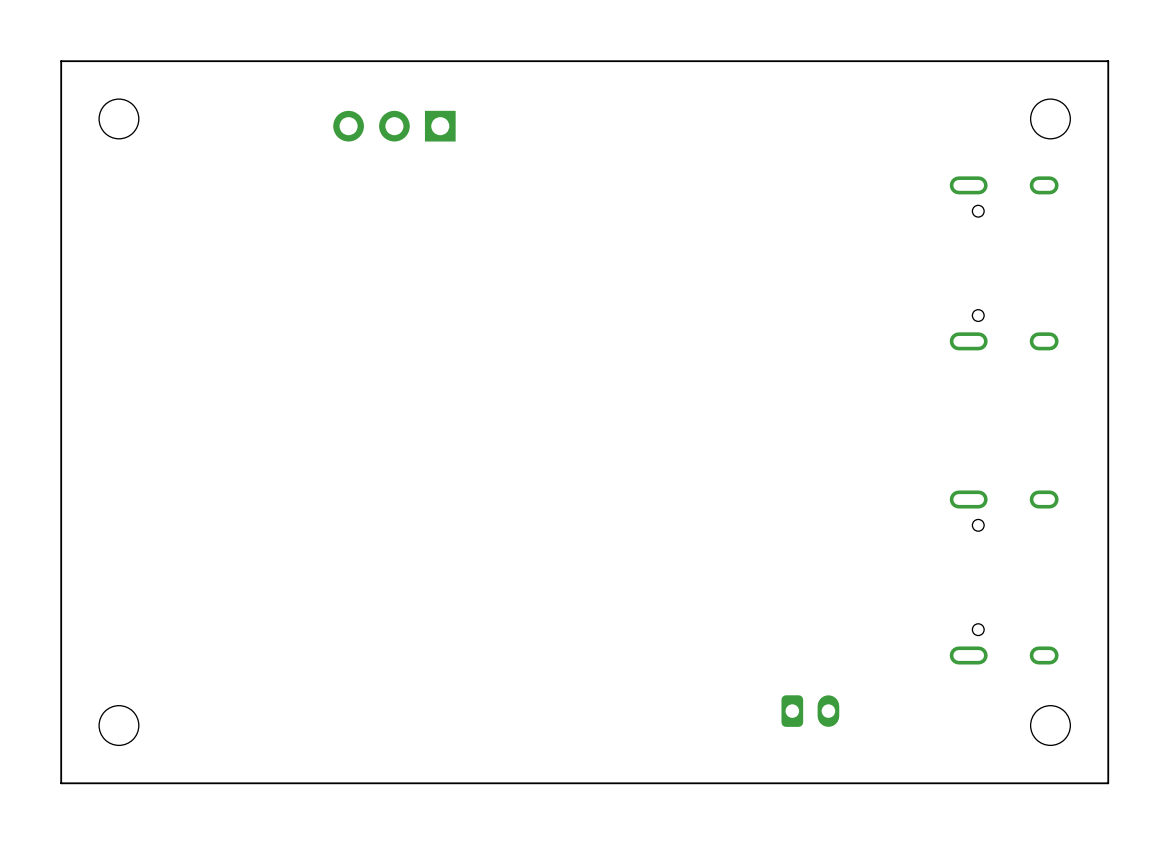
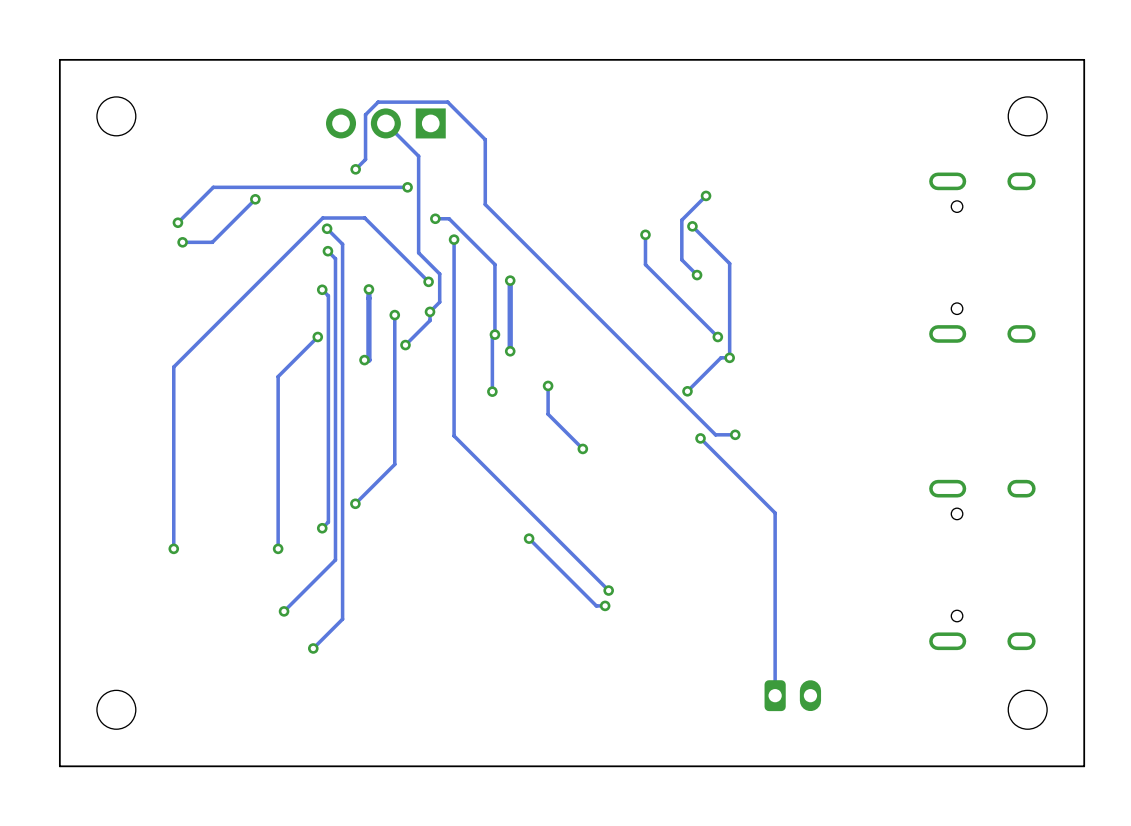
track: none -> (385, 123) (418, 156) (418, 252) (439, 273) (439, 302) (430, 311) (430, 320) (405, 345)
track: none -> (355, 169) (365, 159) (365, 114) (378, 102) (447, 102) (485, 139) (485, 204) (715, 434) (735, 434)
via: none -> (355, 169)
track: none -> (407, 187) (213, 187) (177, 222)
via: none -> (407, 187)
track: none -> (706, 195) (681, 220) (681, 259) (697, 275)
via: none -> (706, 195)
track: none -> (255, 199) (212, 242) (182, 242)
via: none -> (255, 199)
track: none -> (435, 218) (449, 218) (494, 264) (492, 391)
via: none -> (435, 218)
via: none -> (177, 222)
track: none -> (692, 226) (729, 263) (729, 357) (720, 357) (687, 391)
via: none -> (692, 226)
track: none -> (327, 228) (342, 244) (342, 619) (313, 648)
via: none -> (327, 228)
track: none -> (645, 234) (645, 264) (717, 337)
via: none -> (645, 234)
track: none -> (454, 239) (454, 435) (608, 590)
via: none -> (454, 239)
via: none -> (182, 242)
track: none -> (327, 251) (335, 258) (335, 559) (284, 611)
via: none -> (327, 251)
via: none -> (697, 275)
track: none -> (510, 280) (510, 351)
via: none -> (510, 280)
track: none -> (428, 281) (364, 218) (322, 218) (173, 367) (173, 548)
via: none -> (428, 281)
track: none -> (368, 289) (368, 360) (364, 360)
via: none -> (368, 289)
track: none -> (322, 289) (328, 295) (328, 522) (322, 528)
via: none -> (322, 289)
via: none -> (430, 311)
track: none -> (394, 315) (394, 464) (355, 503)
via: none -> (394, 315)
via: none -> (494, 334)
track: none -> (317, 337) (278, 376) (278, 548)
via: none -> (317, 337)
via: none -> (717, 337)
via: none -> (405, 345)
via: none -> (510, 351)
via: none -> (729, 357)
via: none -> (364, 360)
track: none -> (548, 385) (548, 414) (582, 448)
via: none -> (548, 385)
via: none -> (687, 391)
via: none -> (492, 391)
via: none -> (735, 434)
track: none -> (700, 438) (775, 513) (775, 695)
via: none -> (700, 438)
via: none -> (582, 448)
via: none -> (355, 503)
via: none -> (322, 528)
track: none -> (529, 538) (596, 605) (605, 605)
via: none -> (529, 538)
via: none -> (173, 548)
via: none -> (278, 548)
via: none -> (608, 590)
via: none -> (605, 605)
via: none -> (284, 611)
via: none -> (313, 648)

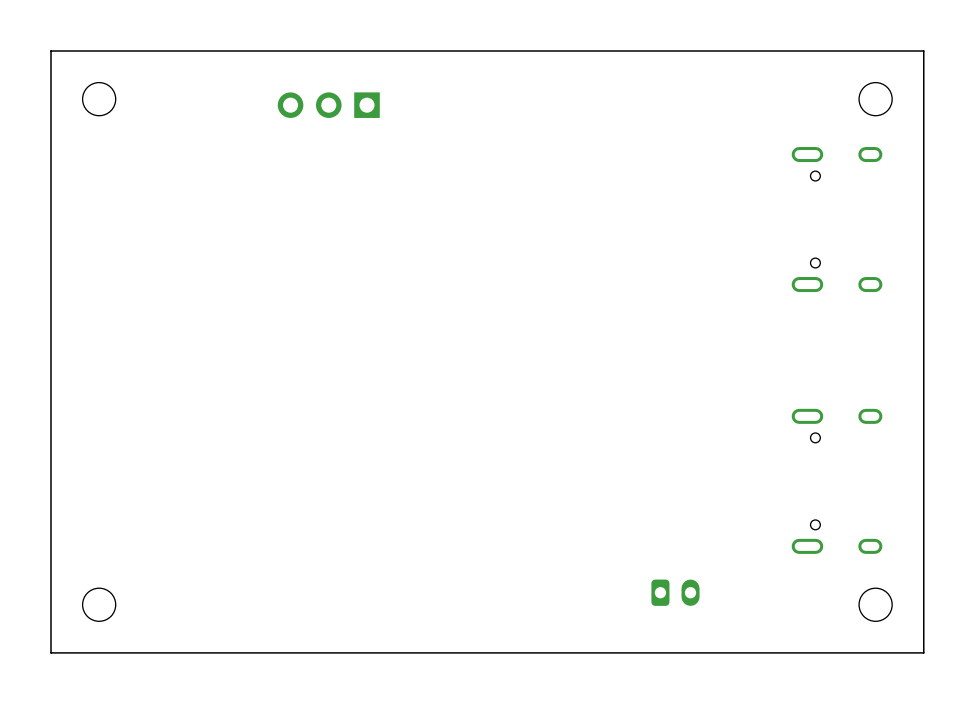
track: (385, 123) (418, 156) (418, 252) (439, 273) (439, 302) (430, 311) (430, 320) (405, 345) -> none
track: (355, 169) (365, 159) (365, 114) (378, 102) (447, 102) (485, 139) (485, 204) (715, 434) (735, 434) -> none
via: (355, 169) -> none
track: (407, 187) (213, 187) (177, 222) -> none
via: (407, 187) -> none
track: (706, 195) (681, 220) (681, 259) (697, 275) -> none
via: (706, 195) -> none
track: (255, 199) (212, 242) (182, 242) -> none
via: (255, 199) -> none
track: (435, 218) (449, 218) (494, 264) (492, 391) -> none
via: (435, 218) -> none
via: (177, 222) -> none
track: (692, 226) (729, 263) (729, 357) (720, 357) (687, 391) -> none
via: (692, 226) -> none
track: (327, 228) (342, 244) (342, 619) (313, 648) -> none
via: (327, 228) -> none
track: (645, 234) (645, 264) (717, 337) -> none
via: (645, 234) -> none
track: (454, 239) (454, 435) (608, 590) -> none
via: (454, 239) -> none
via: (182, 242) -> none
track: (327, 251) (335, 258) (335, 559) (284, 611) -> none
via: (327, 251) -> none
via: (697, 275) -> none
track: (510, 280) (510, 351) -> none
via: (510, 280) -> none
track: (428, 281) (364, 218) (322, 218) (173, 367) (173, 548) -> none
via: (428, 281) -> none
track: (322, 289) (328, 295) (328, 522) (322, 528) -> none
via: (322, 289) -> none
track: (368, 289) (368, 360) (364, 360) -> none
via: (368, 289) -> none
via: (430, 311) -> none
track: (394, 315) (394, 464) (355, 503) -> none
via: (394, 315) -> none
via: (494, 334) -> none
track: (317, 337) (278, 376) (278, 548) -> none
via: (317, 337) -> none
via: (717, 337) -> none
via: (405, 345) -> none
via: (510, 351) -> none
via: (729, 357) -> none
via: (364, 360) -> none
track: (548, 385) (548, 414) (582, 448) -> none
via: (548, 385) -> none
via: (492, 391) -> none
via: (687, 391) -> none
via: (735, 434) -> none
track: (700, 438) (775, 513) (775, 695) -> none
via: (700, 438) -> none
via: (582, 448) -> none
via: (355, 503) -> none
via: (322, 528) -> none
track: (529, 538) (596, 605) (605, 605) -> none
via: (529, 538) -> none
via: (173, 548) -> none
via: (278, 548) -> none
via: (608, 590) -> none
via: (605, 605) -> none
via: (284, 611) -> none
via: (313, 648) -> none

